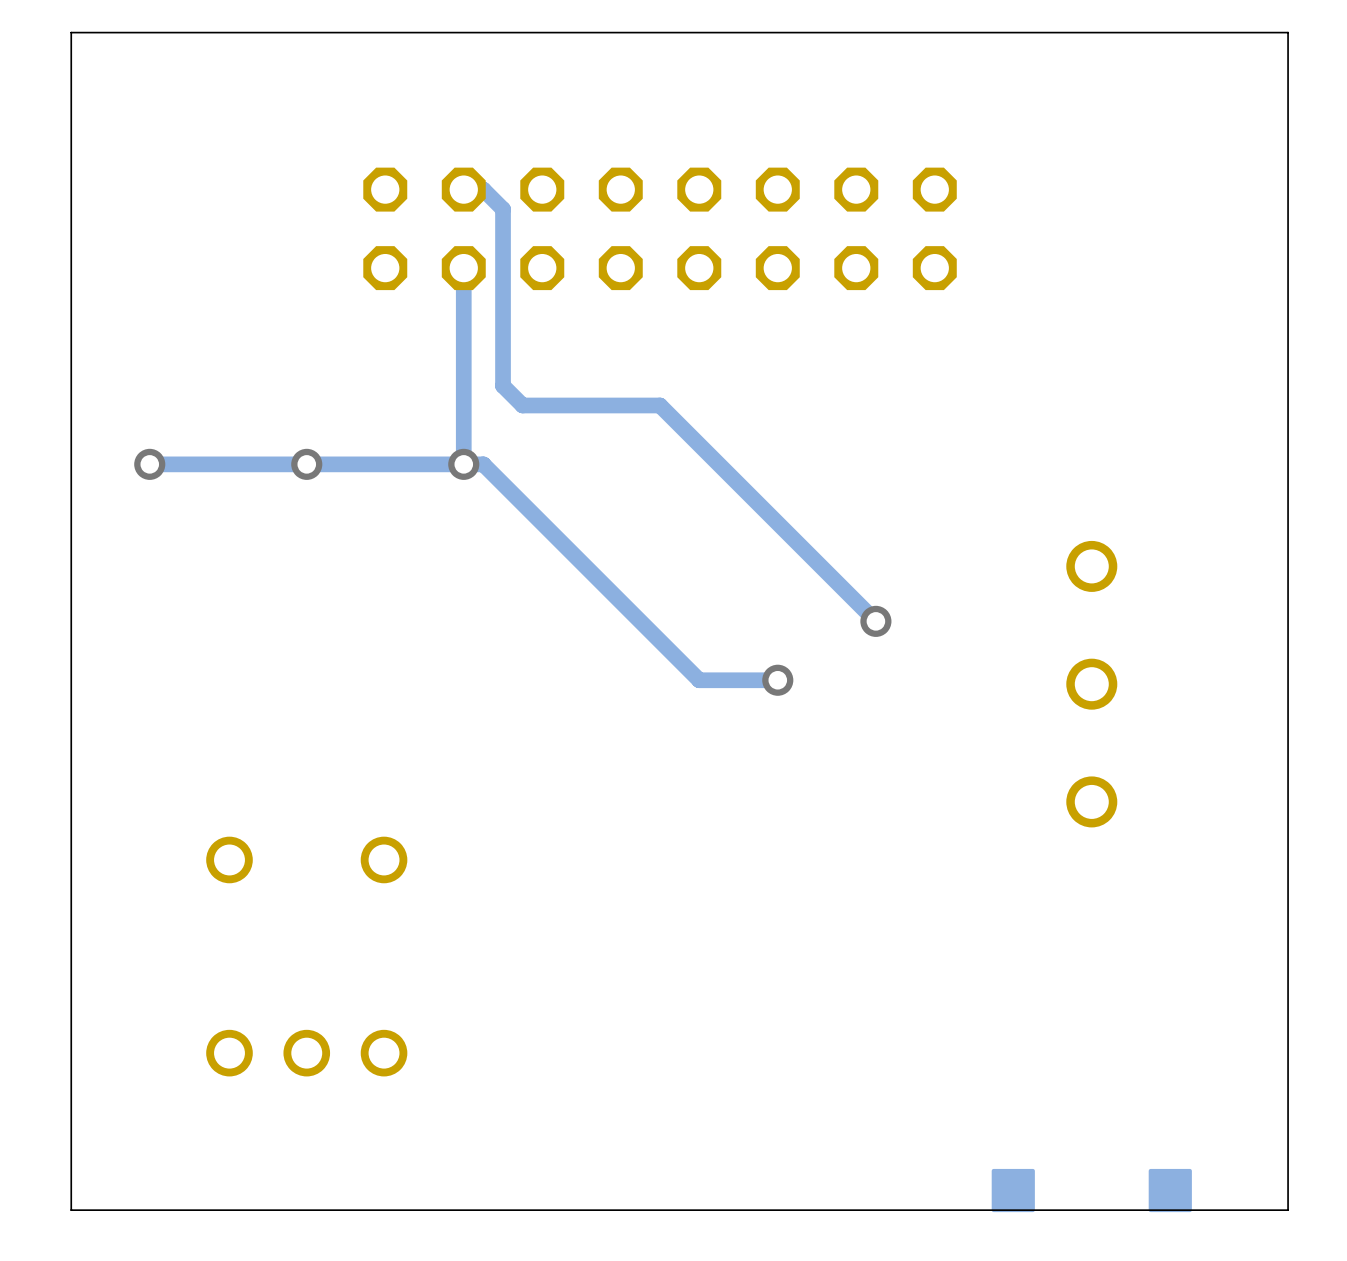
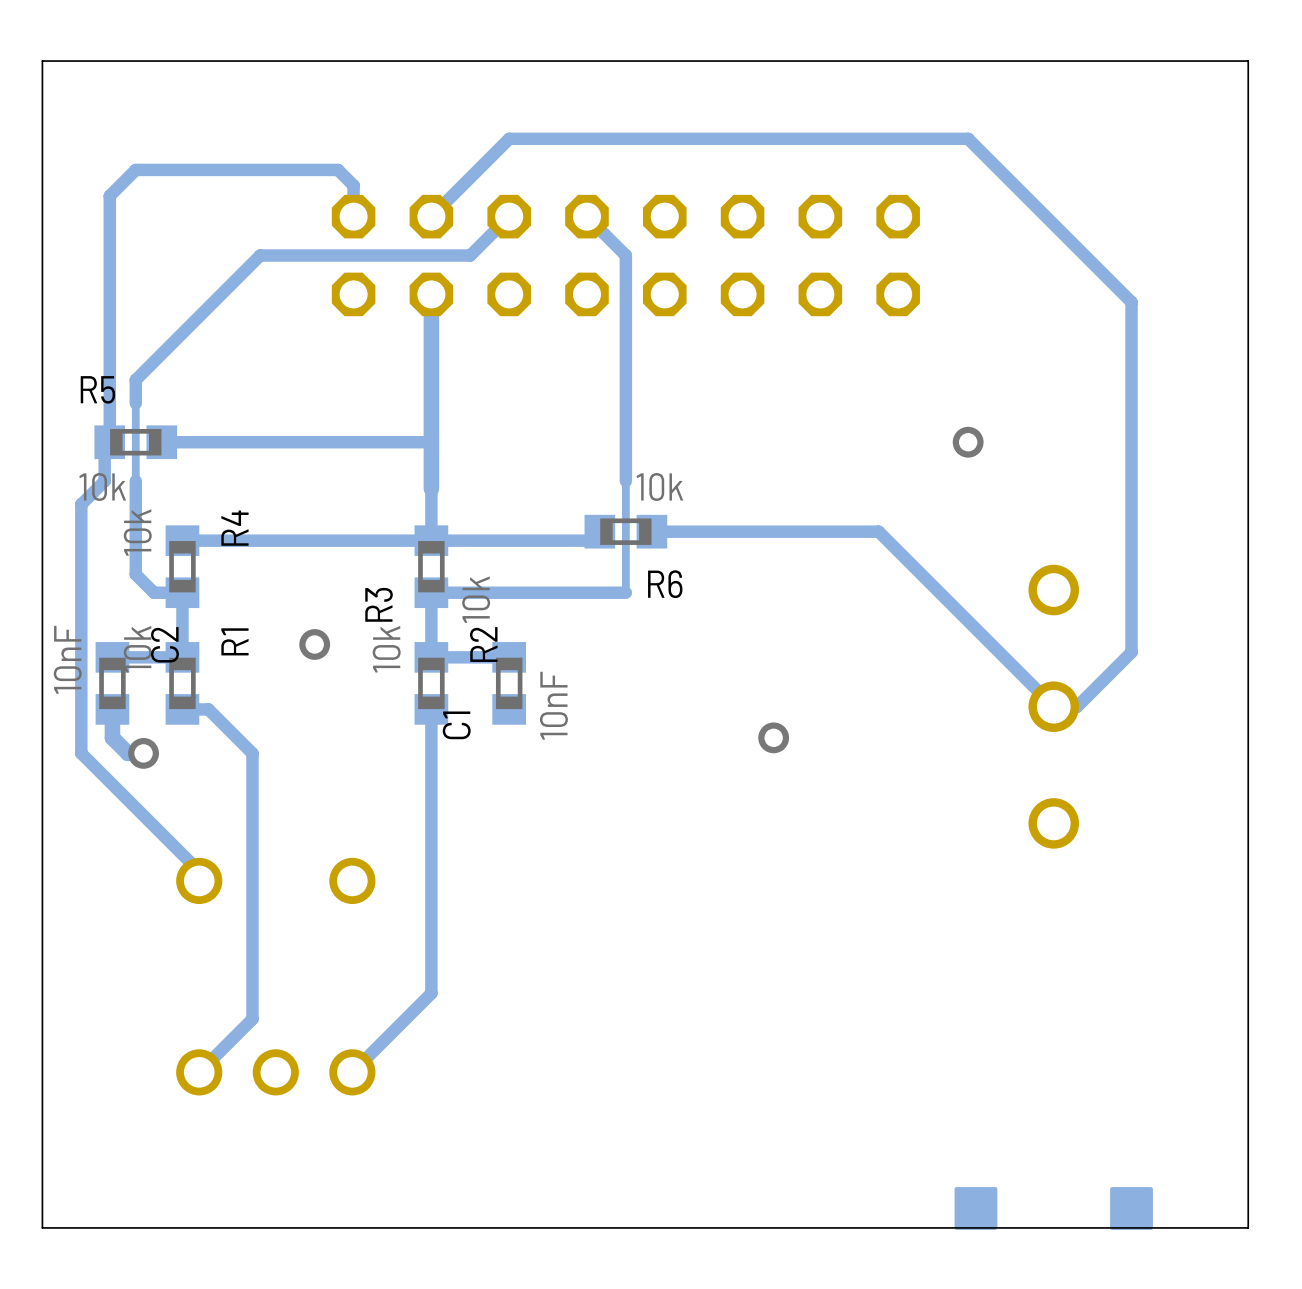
track: none -> (353, 216) (353, 185) (338, 169) (135, 169) (109, 195) (109, 442) (104, 447) (104, 481) (81, 504) (81, 753) (199, 871) (199, 880)
track: (463, 189) (483, 189) (503, 209) (503, 385) (522, 405) (660, 405) (875, 621) -> (431, 216) (509, 138) (968, 138) (1131, 302) (1131, 652) (1077, 706) (1053, 706) (878, 531) (651, 531)
track: none -> (509, 216) (470, 255) (260, 255) (135, 379) (135, 574) (154, 592) (182, 592) (182, 657) (112, 657)
track: none -> (586, 216) (625, 255) (625, 592) (431, 592) (431, 657) (509, 657)
R5: none -> 10k (135, 442)
track: none -> (431, 442) (161, 442)
via: none -> (968, 442)
track: (149, 464) (483, 464) (699, 680) (777, 680) -> none
via: (149, 464) -> none
via: (306, 464) -> none
track: none -> (431, 488) (431, 540)
via: (463, 464) -> none
track: none -> (599, 531) (599, 540) (182, 540)
R6: none -> 10k (625, 531)
R4: none -> 10k (182, 566)
R3: none -> 10k (431, 566)
via: none -> (314, 644)
via: (875, 621) -> none
C2: none -> 10nF (112, 683)
R1: none -> 10k (182, 683)
R2: none -> 10k (431, 683)
C1: none -> 10nF (509, 683)
via position: (777, 680) -> (773, 737)
track: none -> (112, 709) (112, 737) (128, 753) (143, 753)
track: none -> (182, 709) (208, 709) (252, 753) (252, 1019) (199, 1072)
track: none -> (431, 709) (431, 993) (352, 1072)
via: none -> (143, 753)

